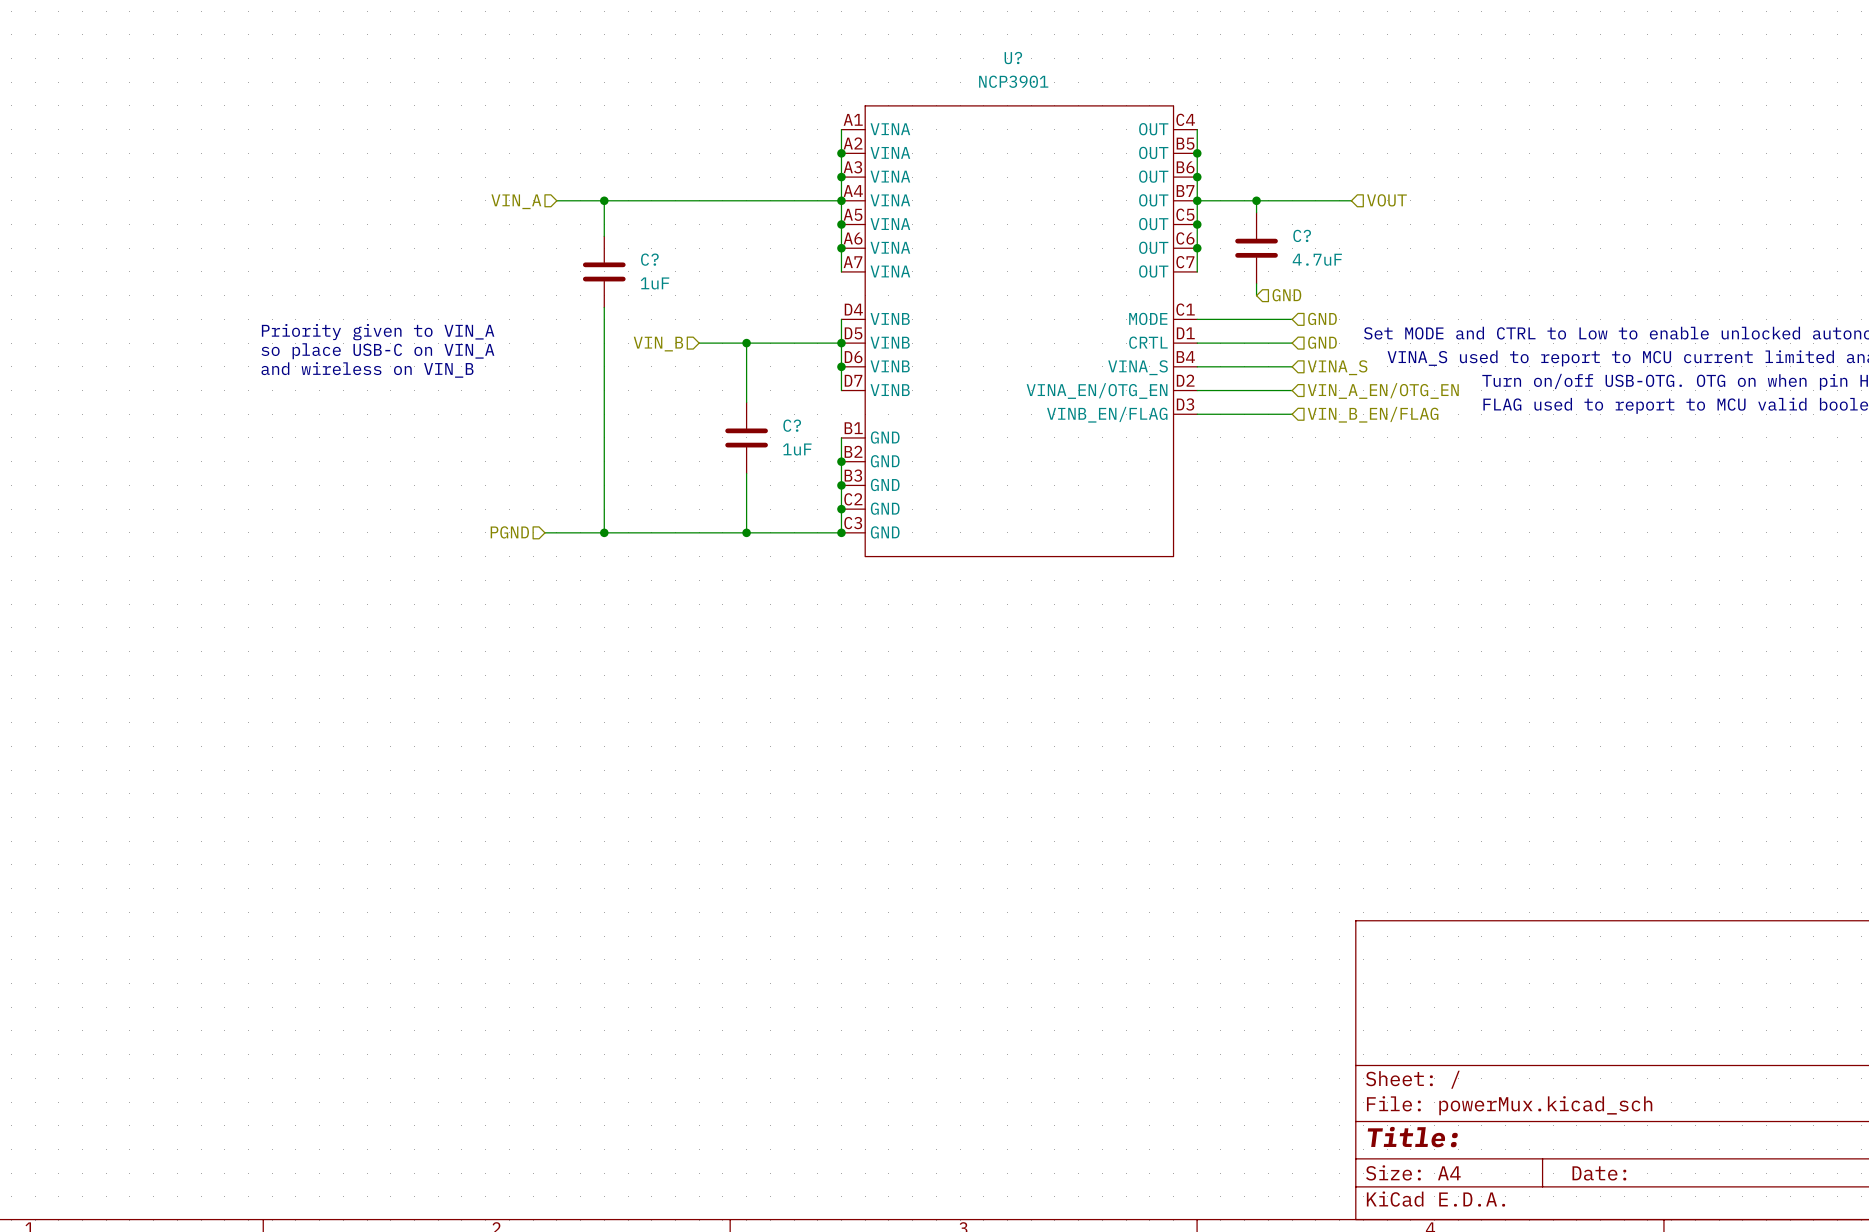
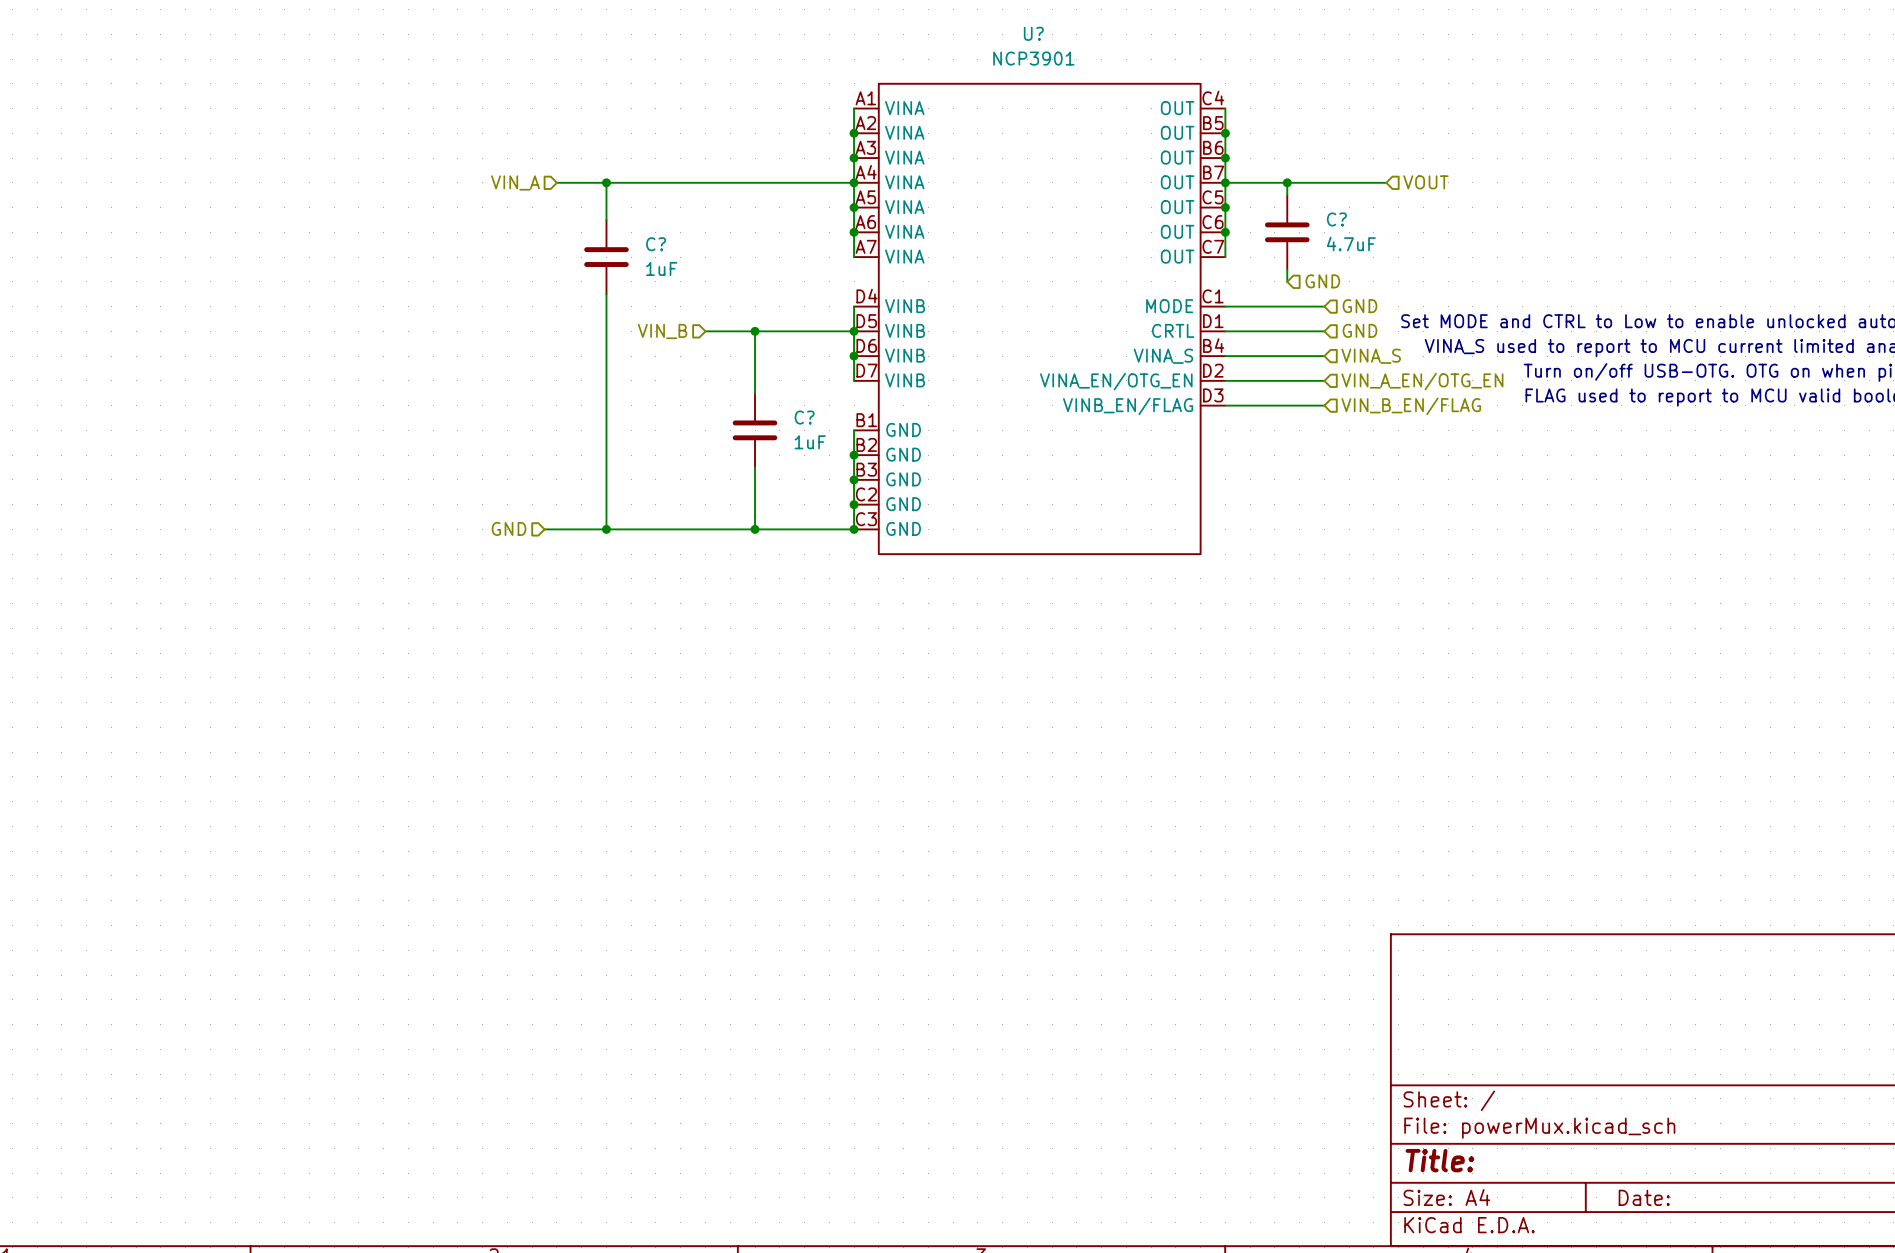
text: Priority given to VIN_A (378, 332) -> none
text: so place USB-C on VIN_A (377, 351) -> none
text: and wireless on VIN_B (367, 369) -> none
hierarchical label: PGND (509, 532) -> GND (509, 528)

